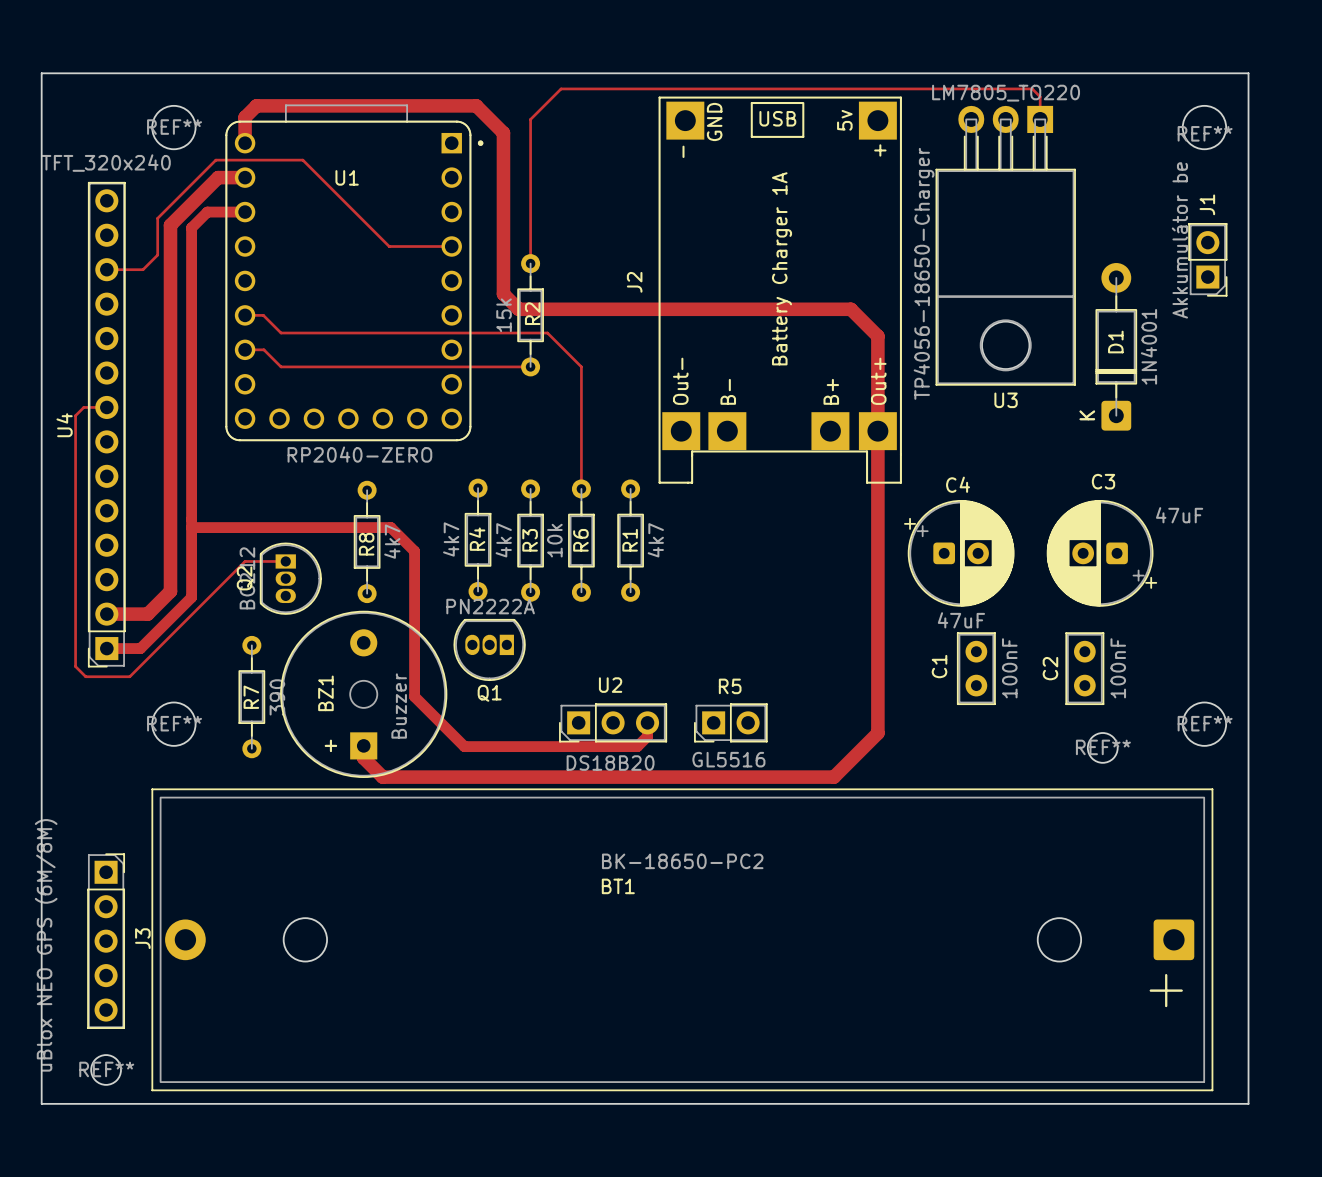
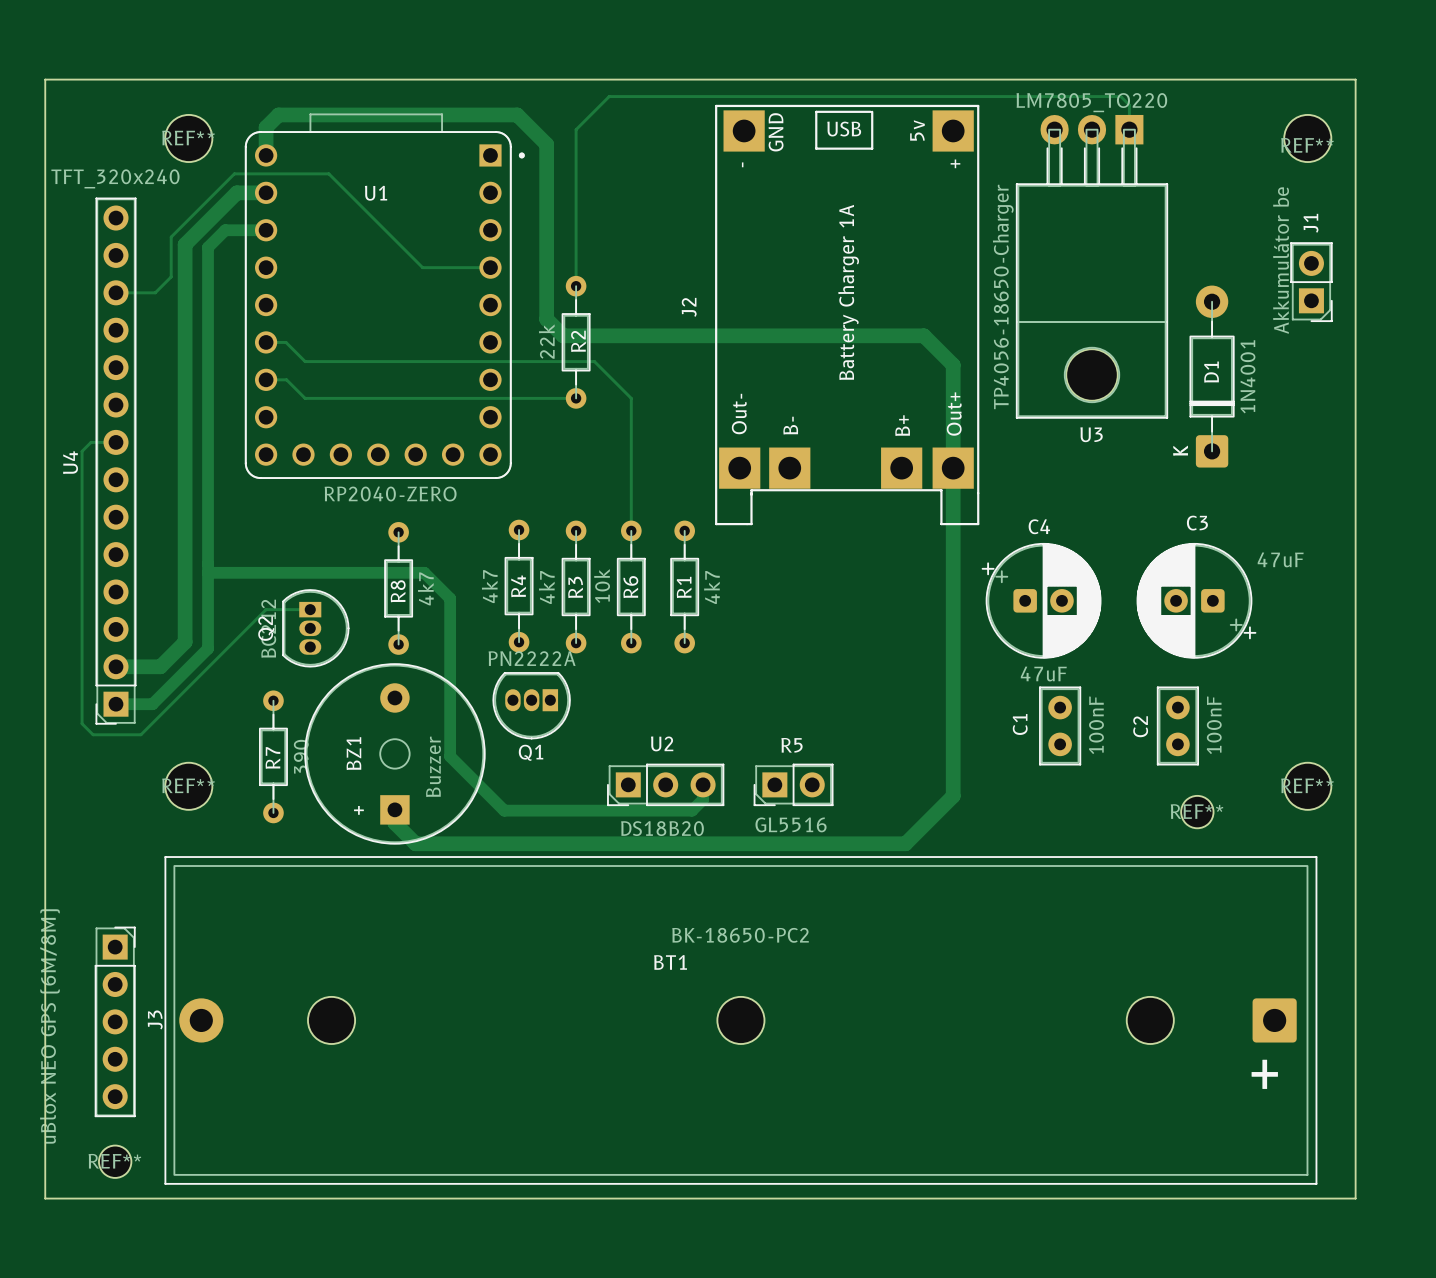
R2 value: 15k (504, 315) -> 22k (546, 341)
part: none -> (740, 1020)

